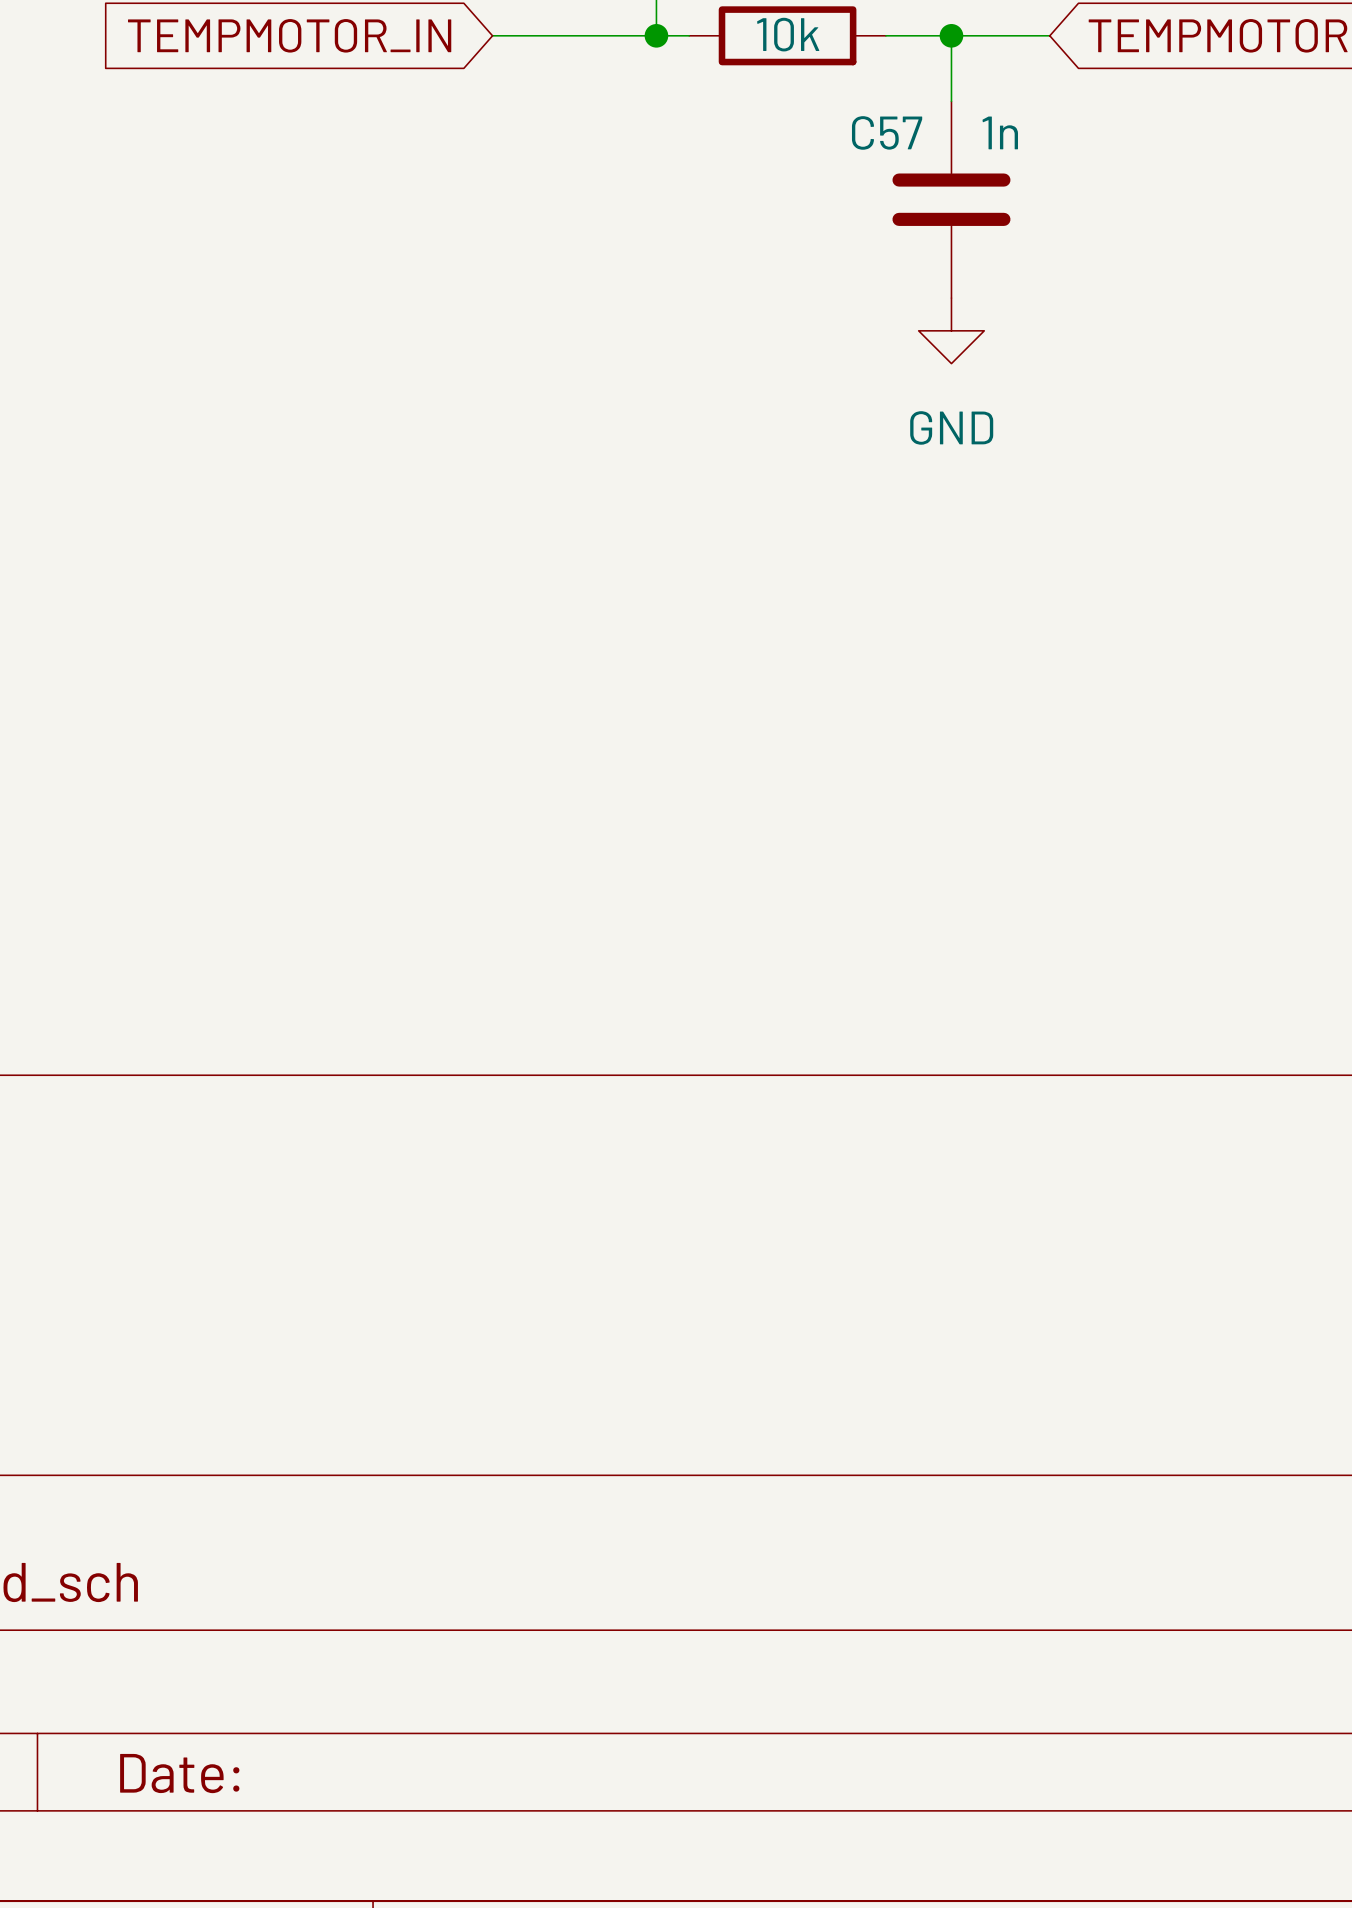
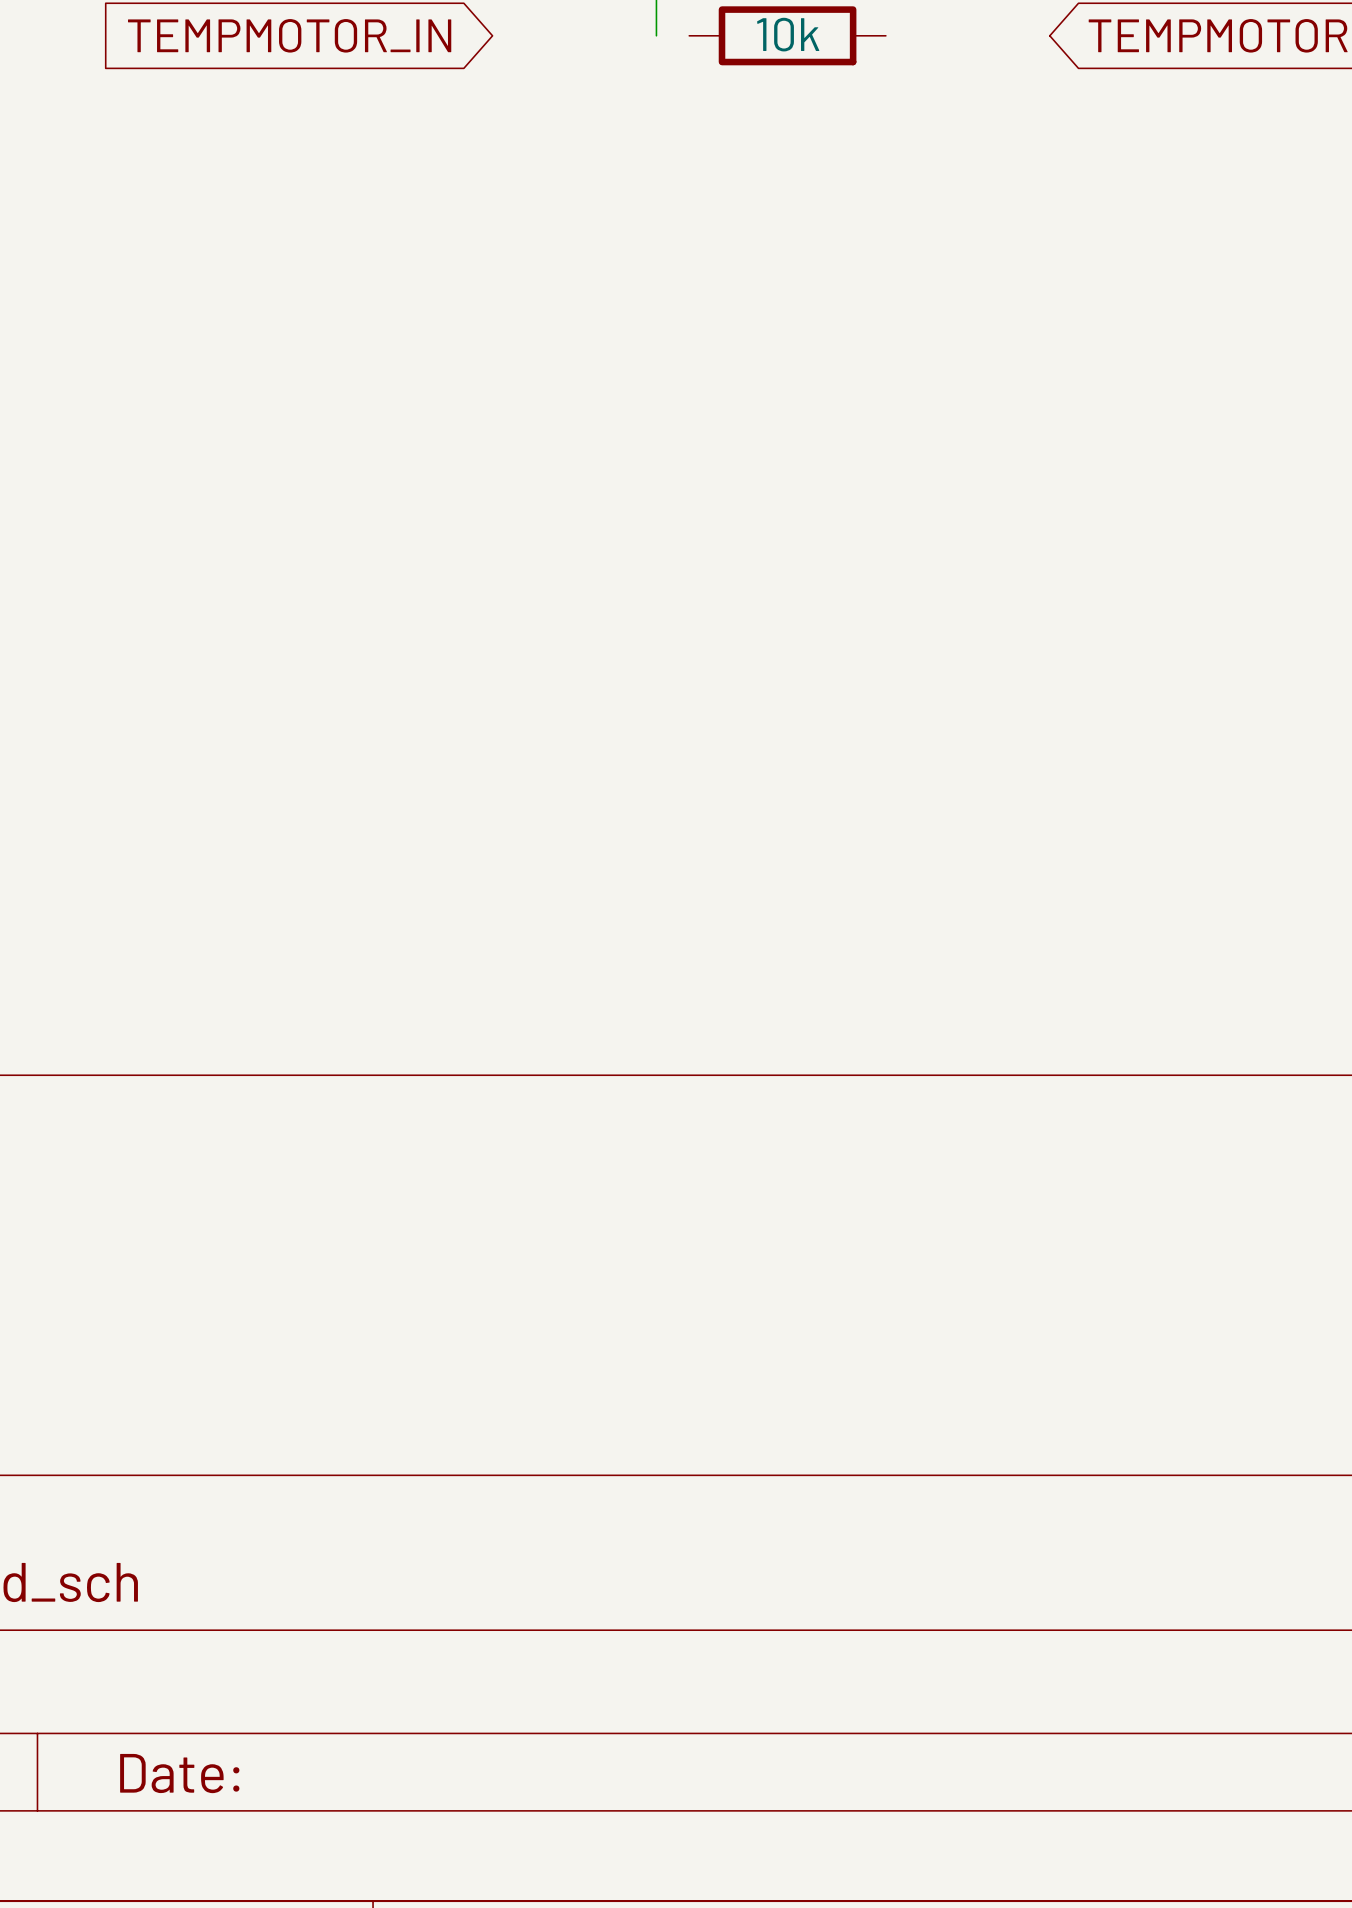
wire: (492, 35) (689, 35) -> none
junction: (656, 35) -> none
wire: (885, 35) (1049, 35) -> none
wire: (951, 35) (951, 101) -> none
junction: (951, 35) -> none
C57: 1n (951, 199) -> none
power symbol: GND (951, 330) -> none

